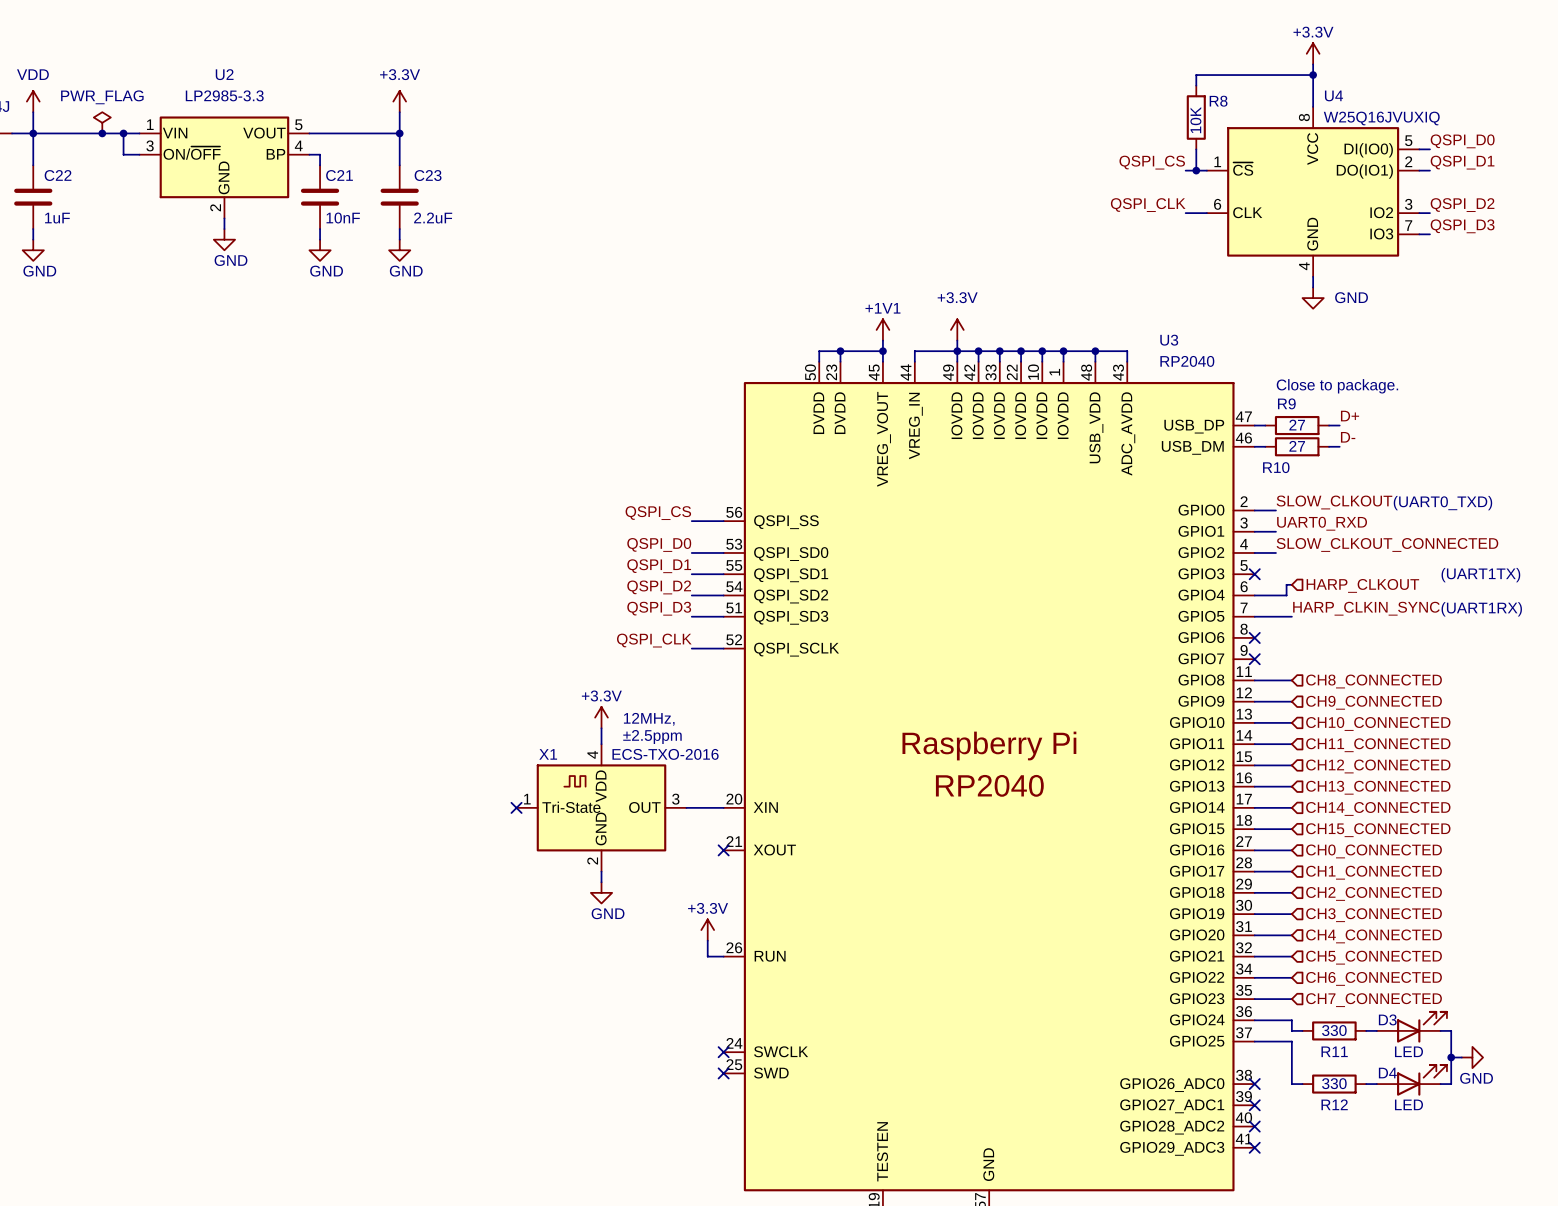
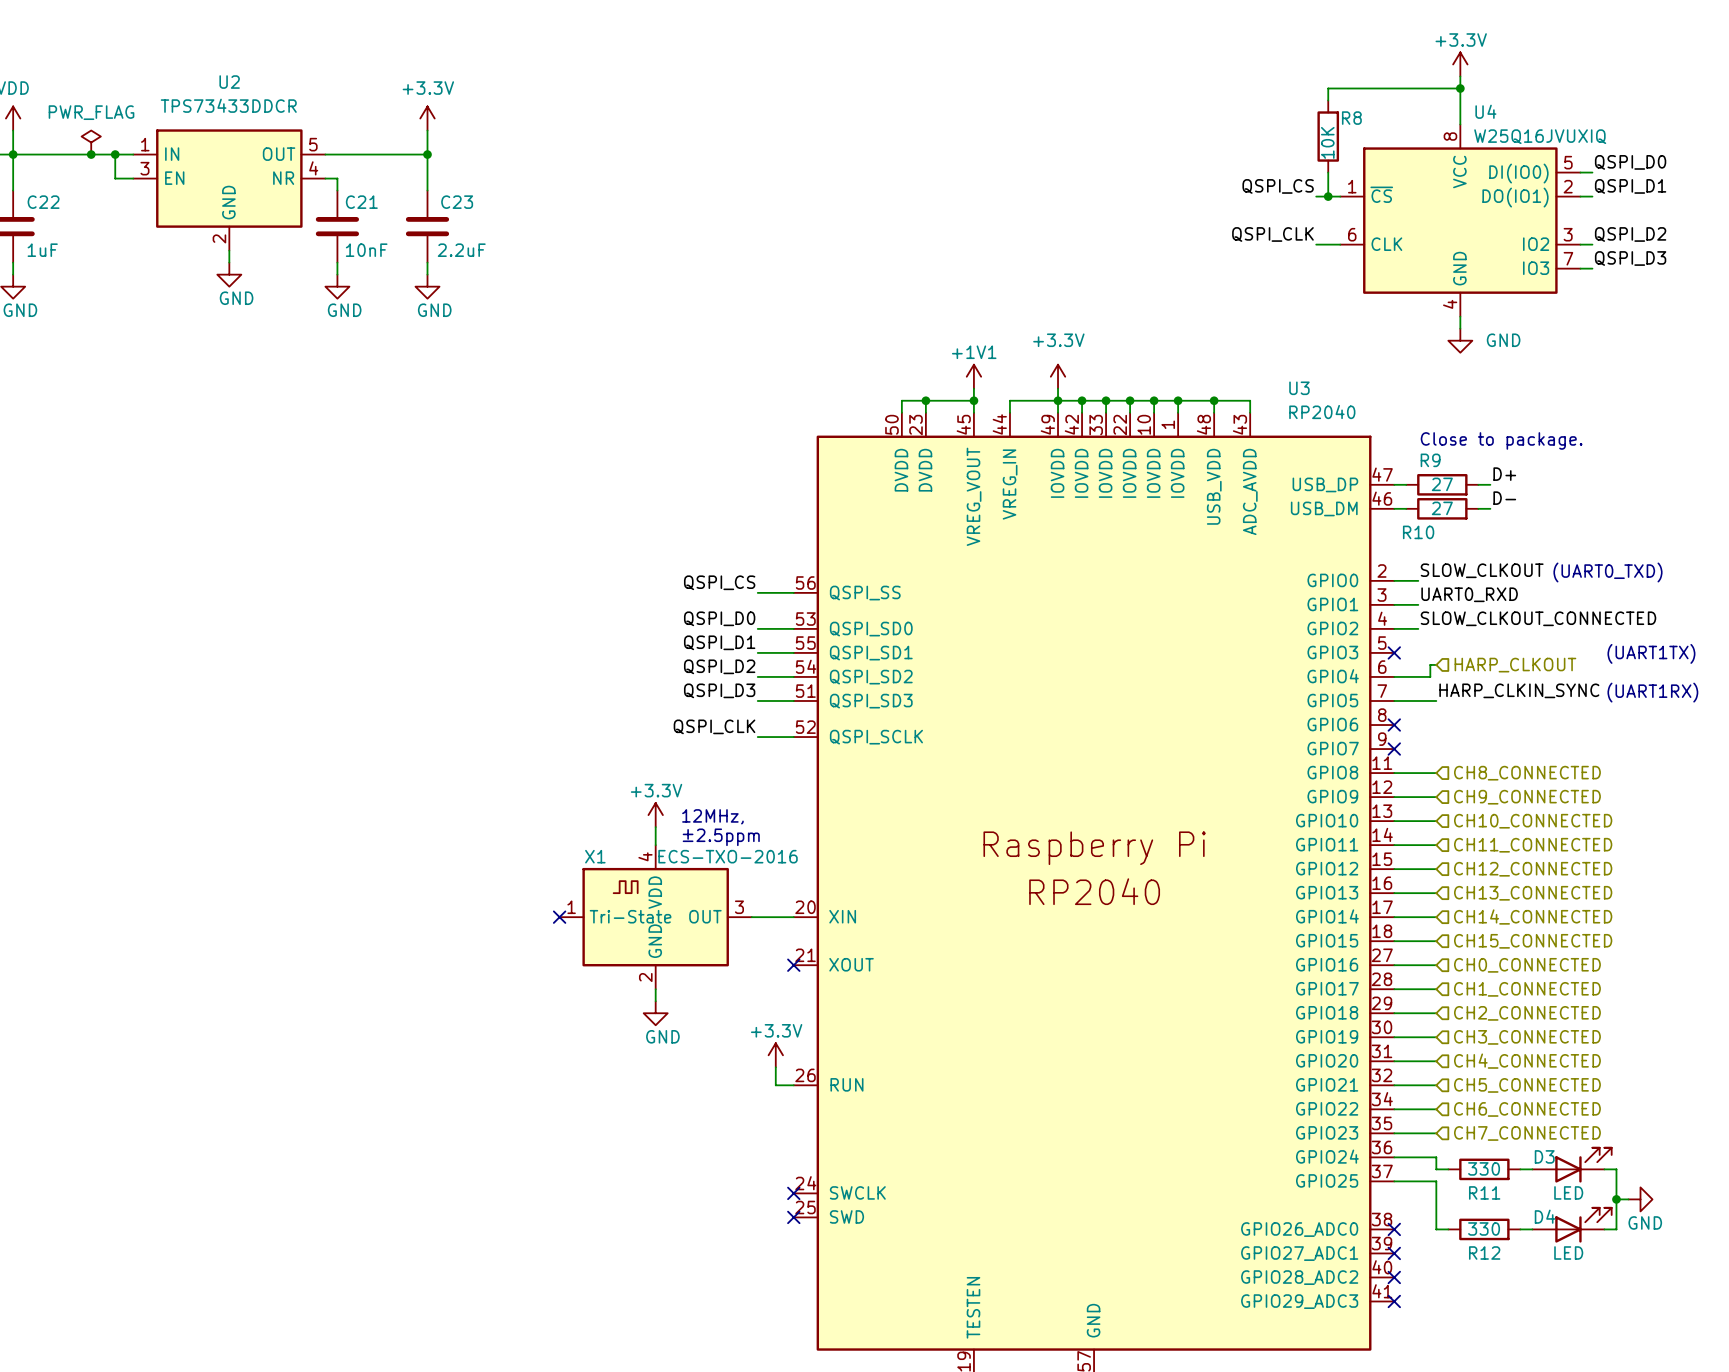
U2 value: LP2985-3.3 (224, 95) -> TPS73433DDCR (228, 105)
U2 symbol: [139, 116, 310, 219] -> [133, 129, 326, 251]

